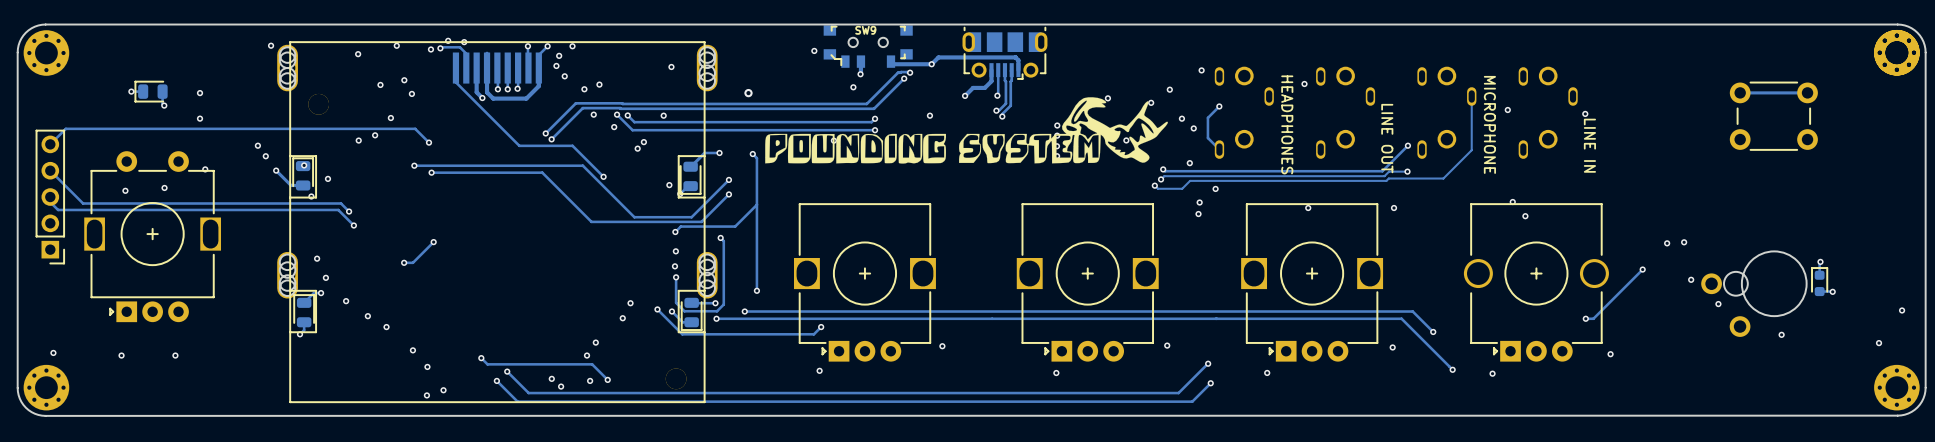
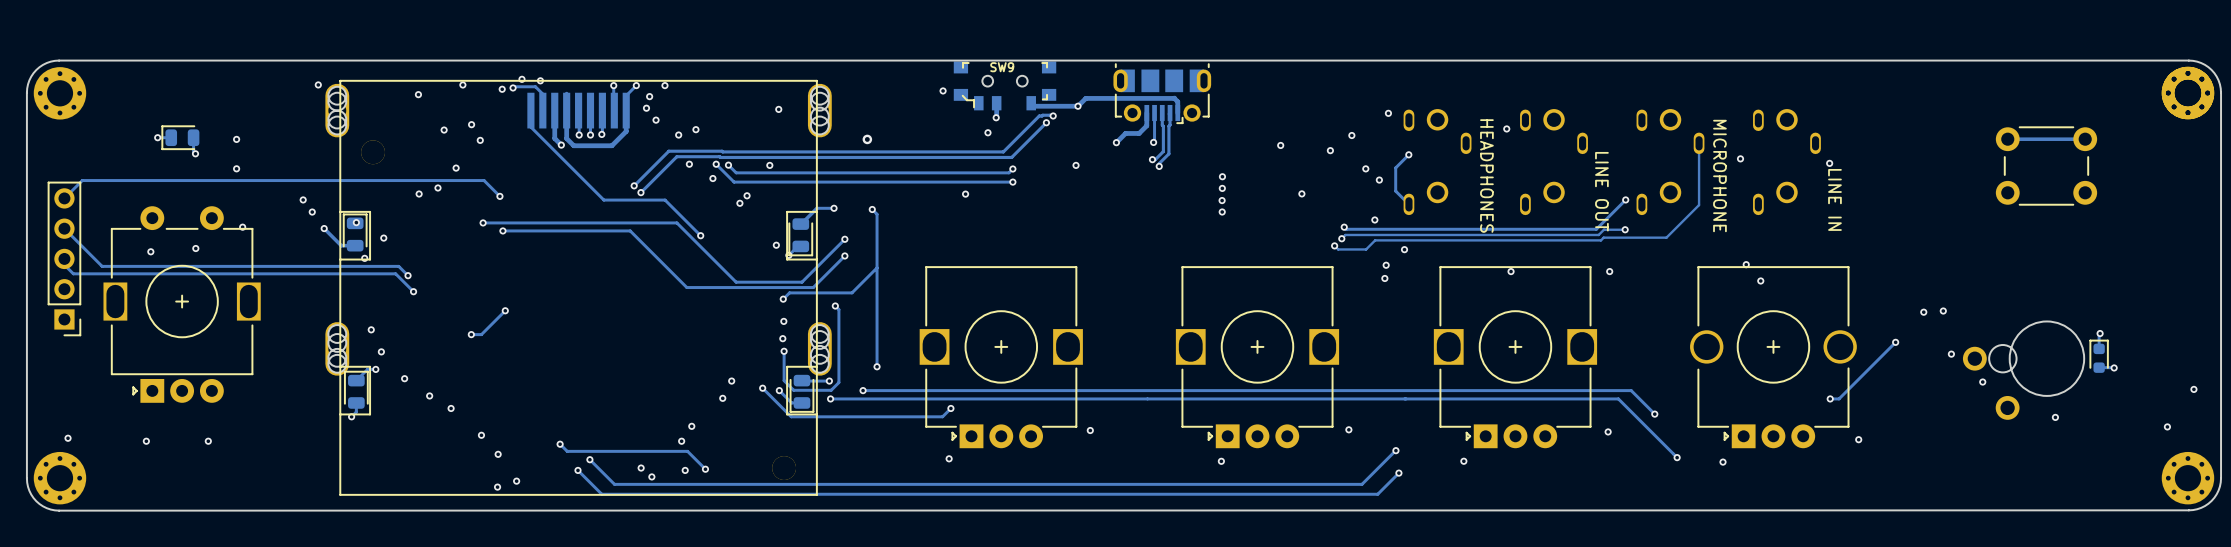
drawing: [765, 97, 1168, 164] -> none

